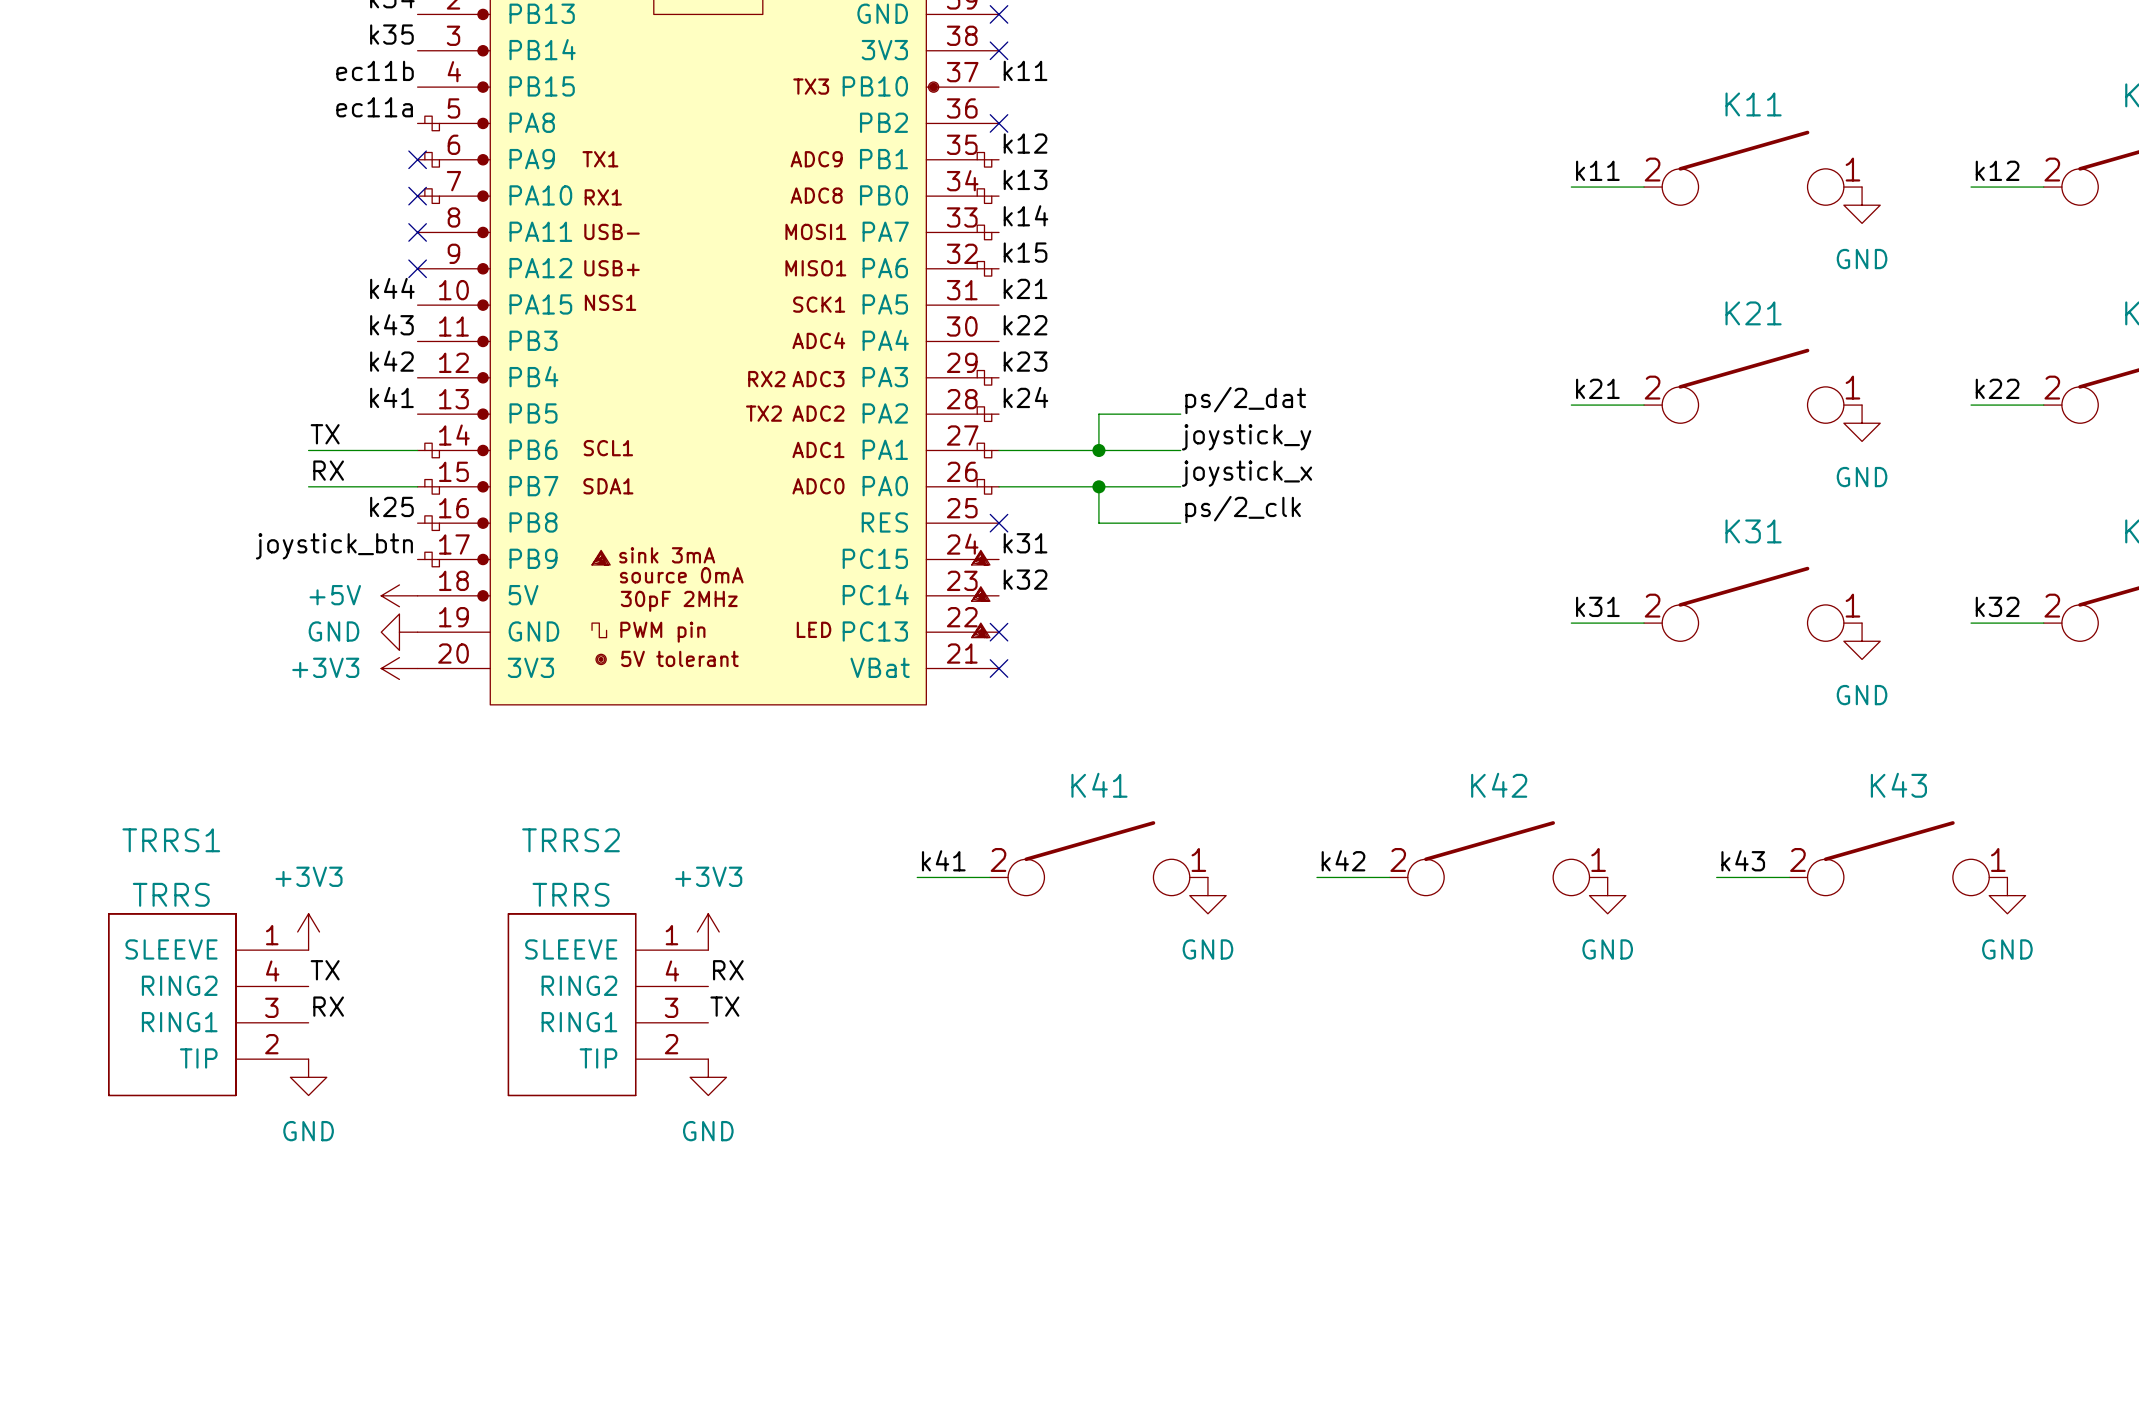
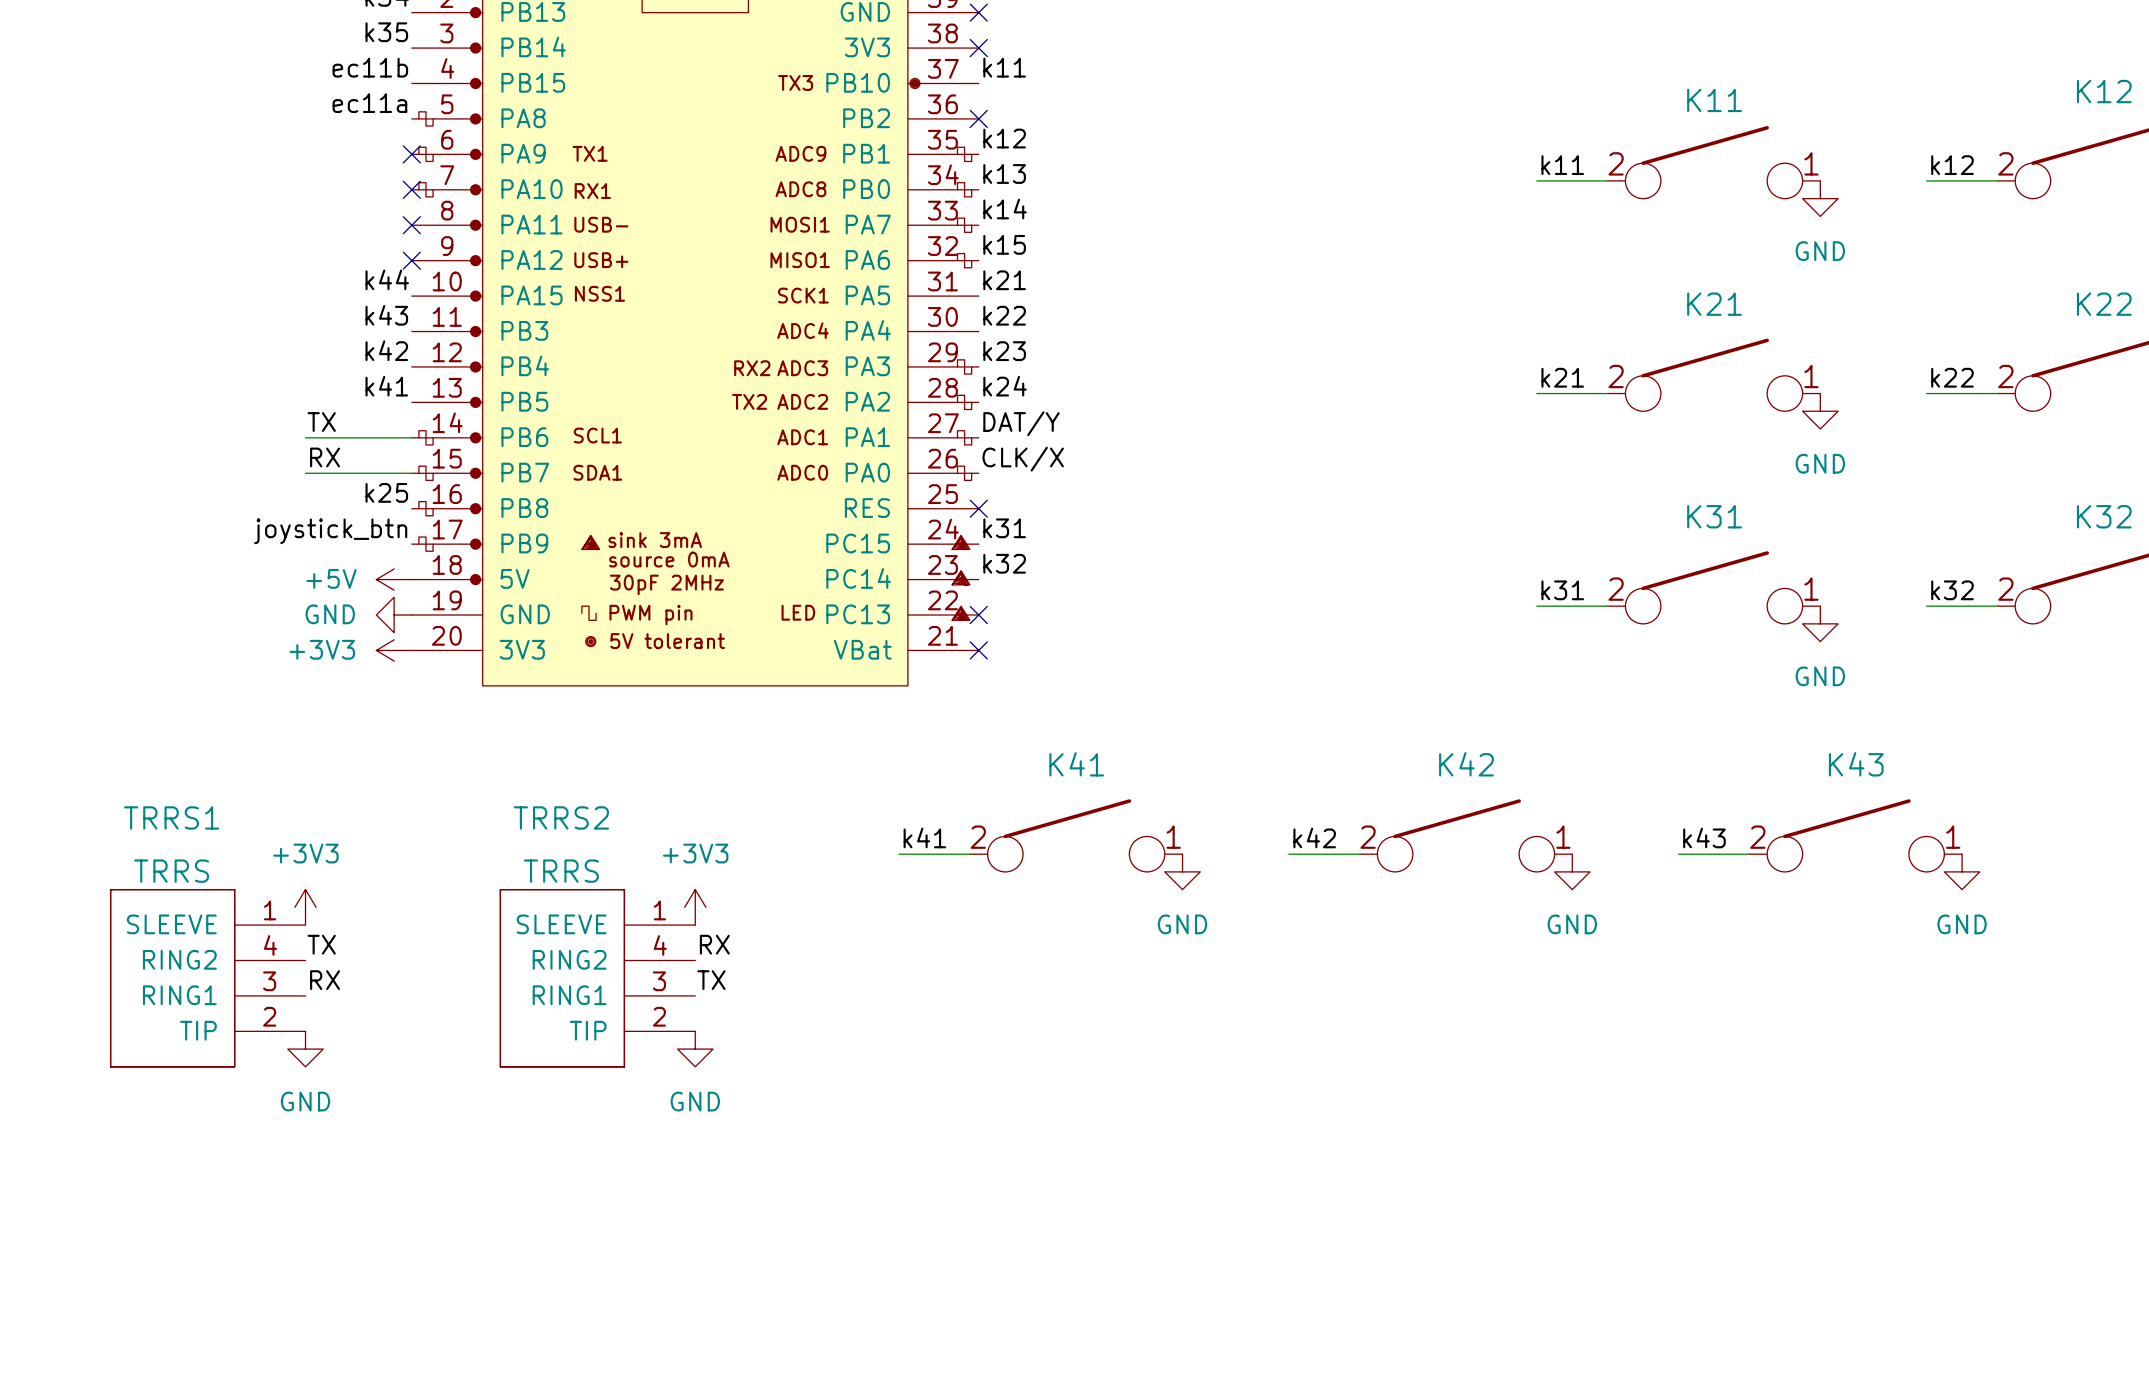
label: ps/2_dat (1245, 400) -> none
wire: (1180, 414) (1098, 414) (1098, 450) -> none
label: none -> DAT/Y (1021, 423)
label: joystick_y (1246, 437) -> none
wire: (999, 450) (1180, 450) -> none
junction: (1098, 450) -> none
label: none -> CLK/X (1023, 459)
label: joystick_x (1247, 473) -> none
wire: (999, 486) (1180, 486) -> none
wire: (1098, 486) (1098, 523) (1180, 523) -> none
junction: (1098, 486) -> none
label: ps/2_clk (1243, 509) -> none

